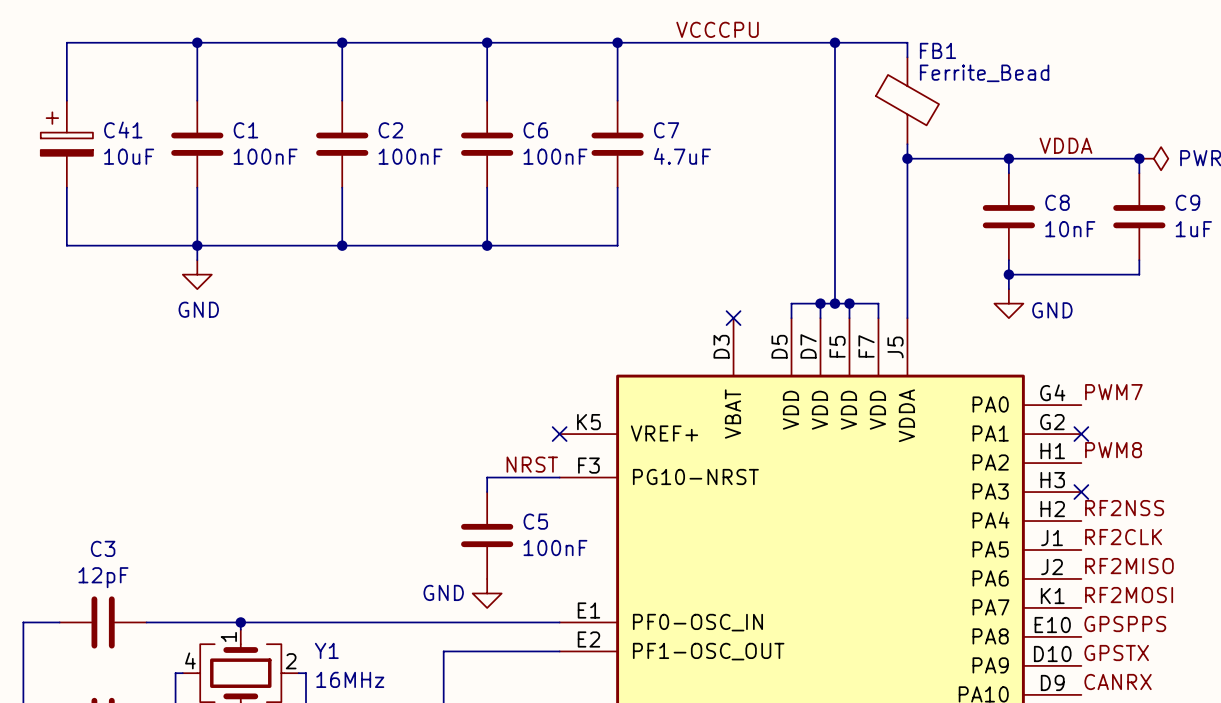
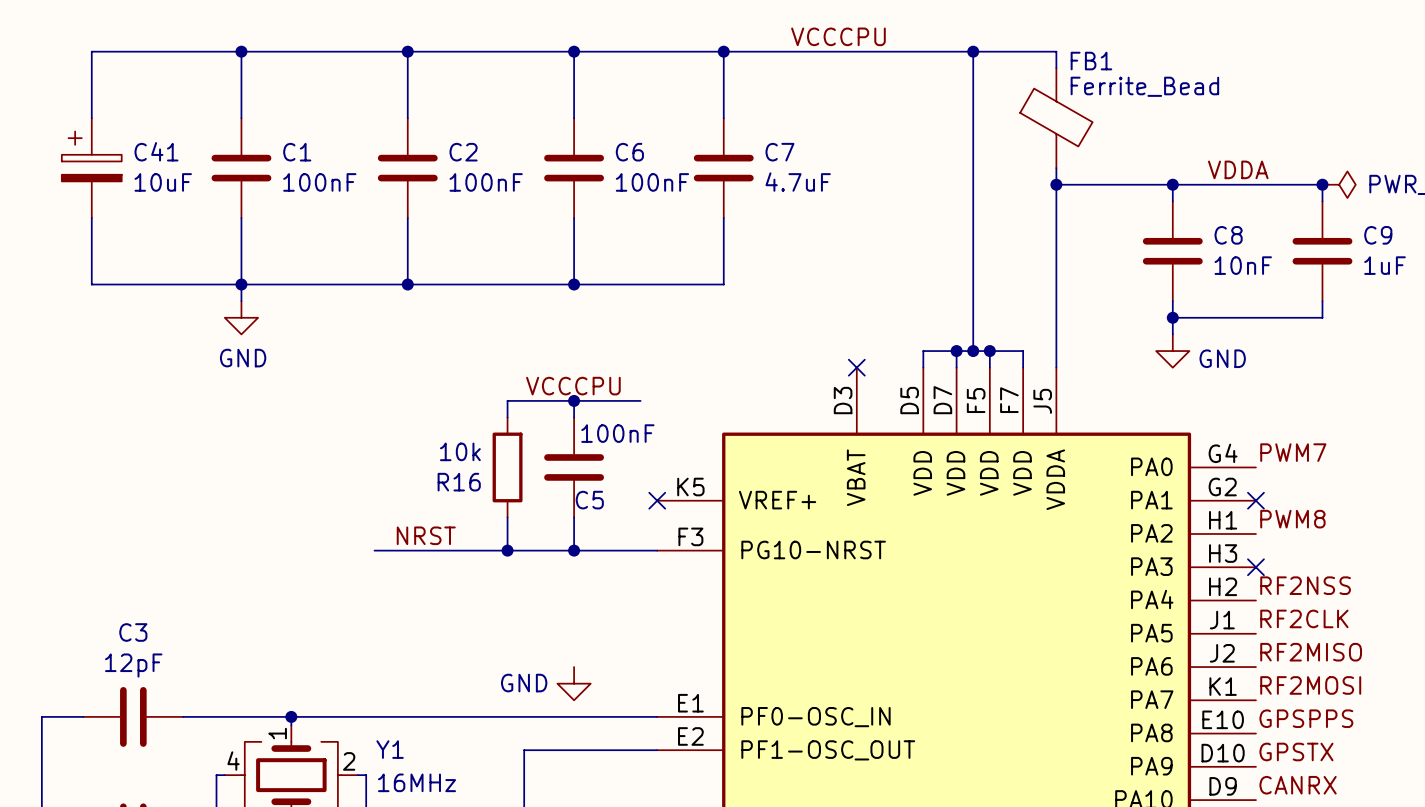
label: none -> VCCCPU (573, 386)
junction: none -> (574, 400)
wire: none -> (640, 400) (507, 400) (507, 417)
R16: none -> 10k (507, 467)
wire: none -> (507, 517) (507, 550)
wire: none -> (574, 517) (574, 550) (374, 550)
label position: NRST (532, 464) -> NRST (426, 535)
junction: none -> (507, 550)
wire: (487, 477) (487, 492) -> (574, 400) (574, 417)
junction: none -> (574, 550)
C5 name position: C5 (535, 521) -> C5 (589, 500)
C5 position: (487, 535) -> (574, 467)
C5 value position: 100nF (555, 548) -> 100nF (617, 433)

